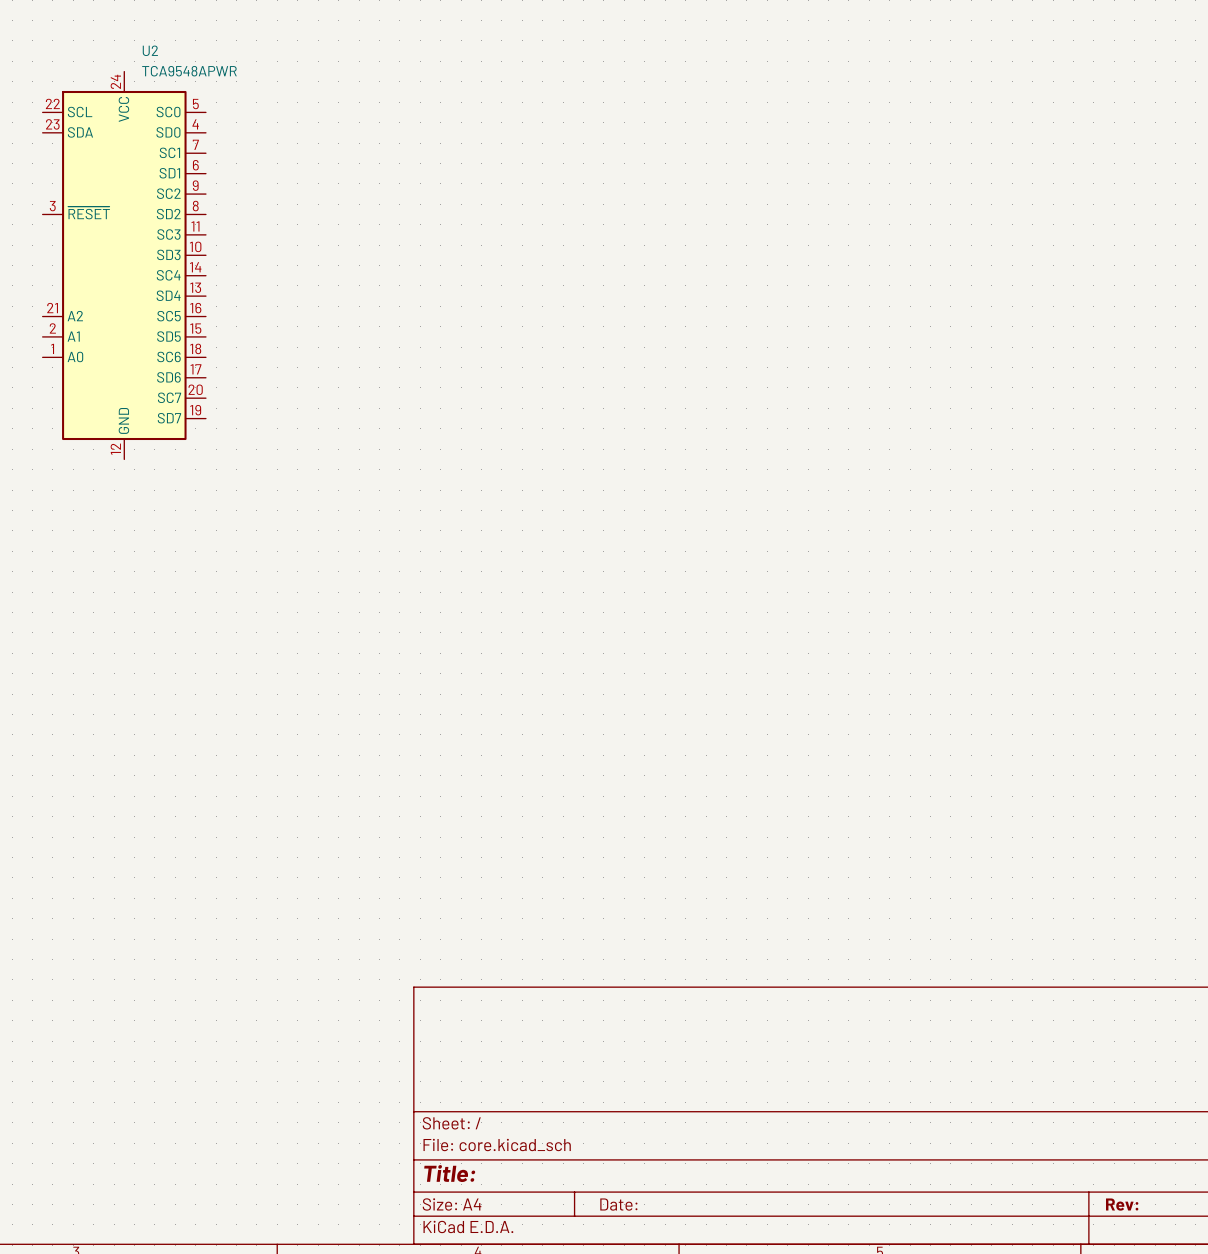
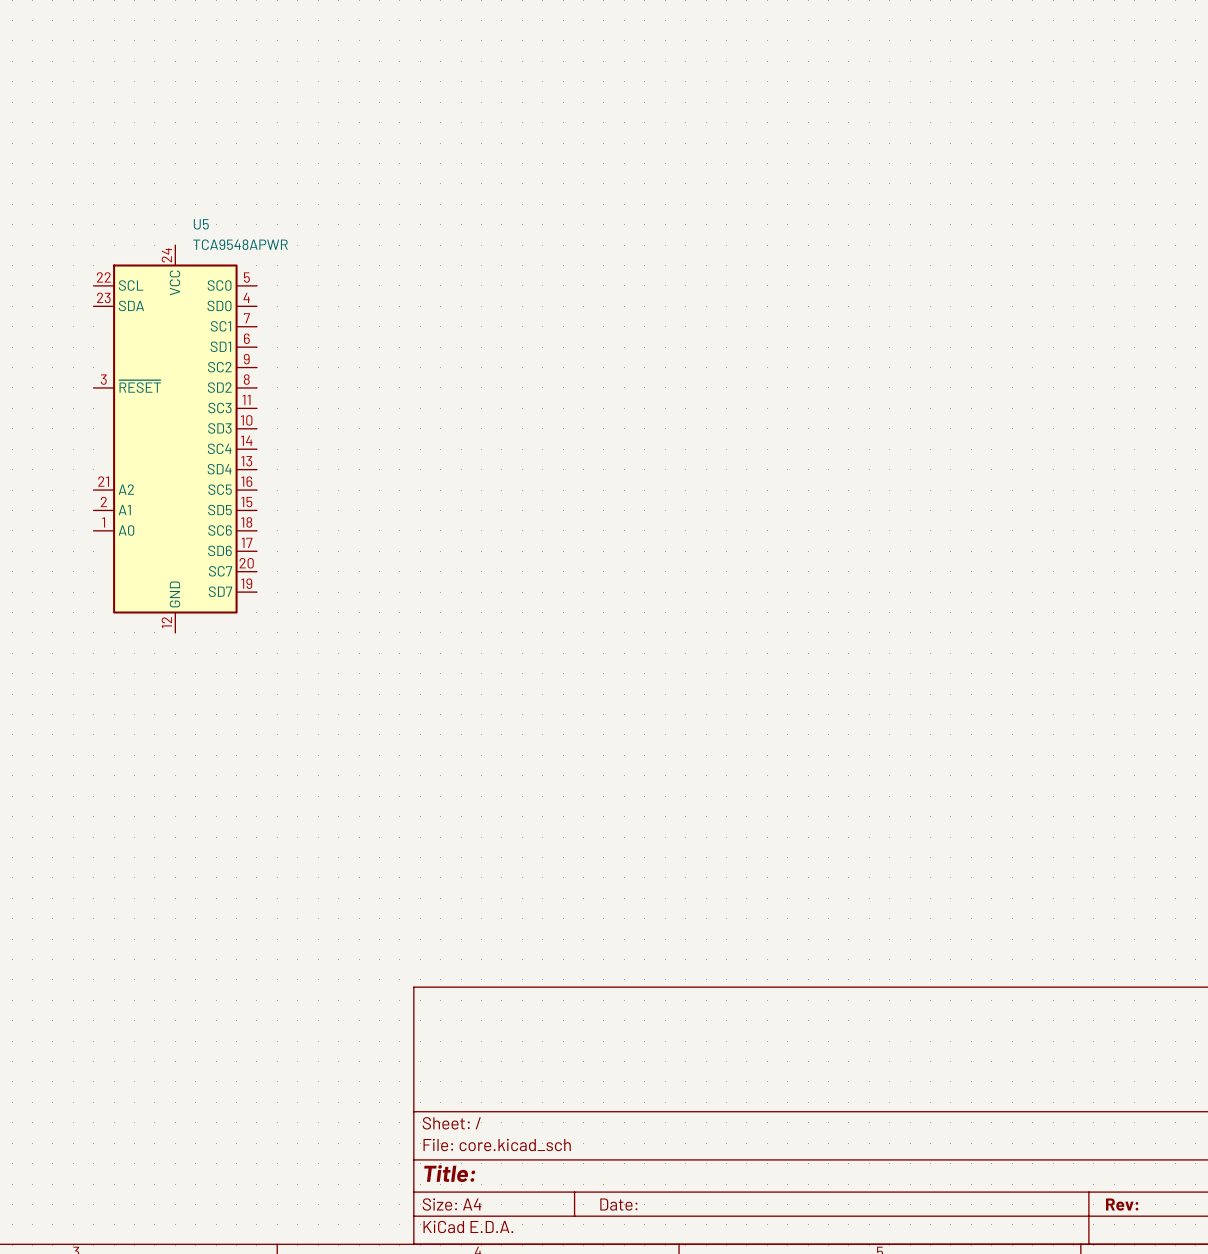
U2: TCA9548APWR (124, 265) -> none
U5: none -> TCA9548APWR (175, 439)

